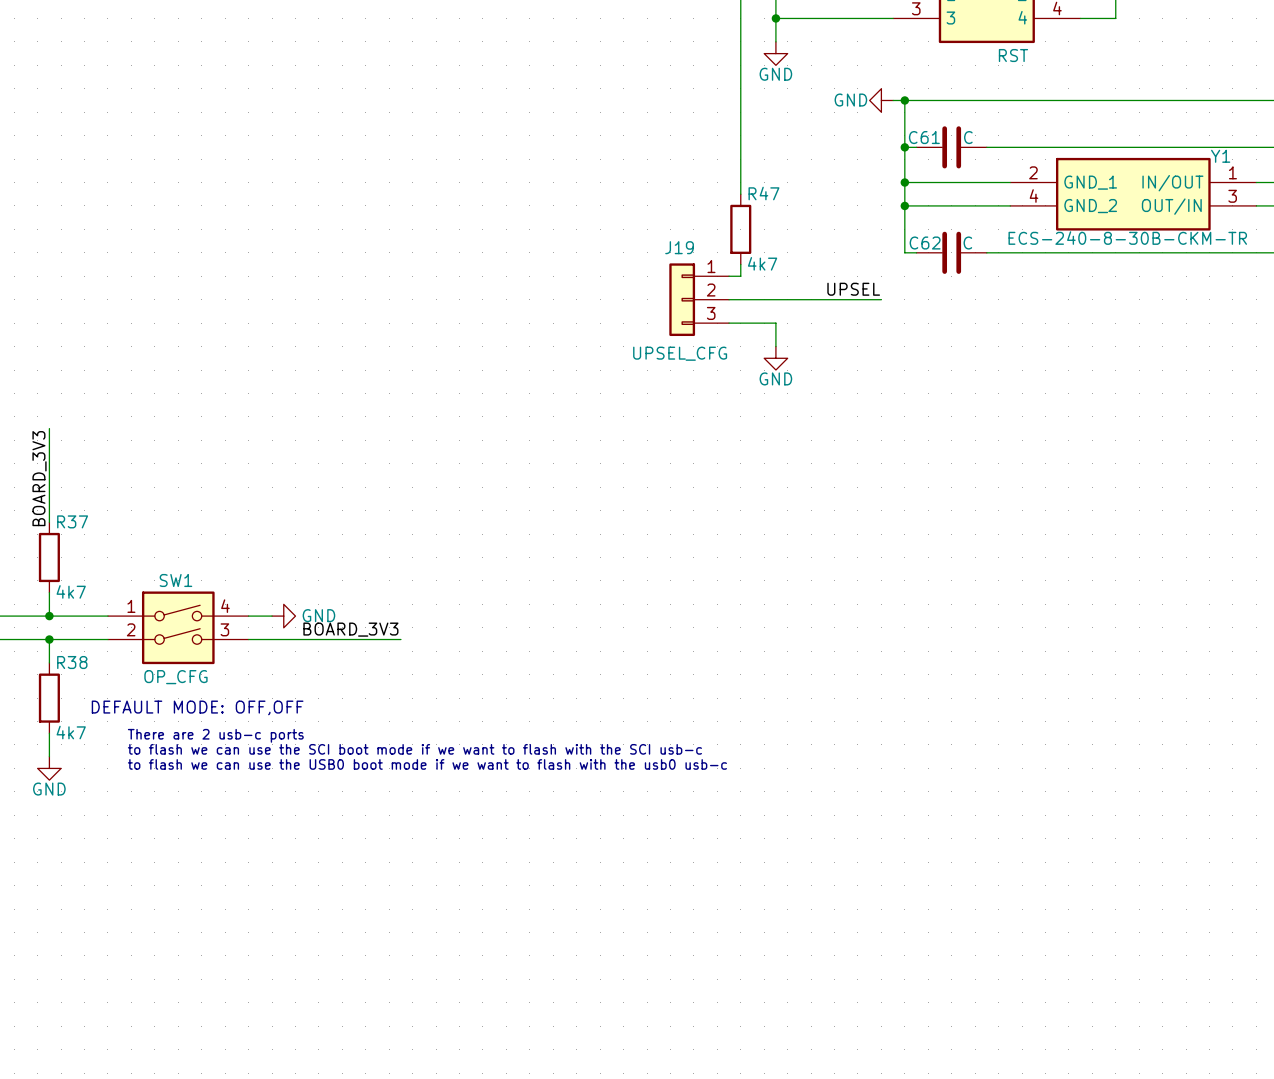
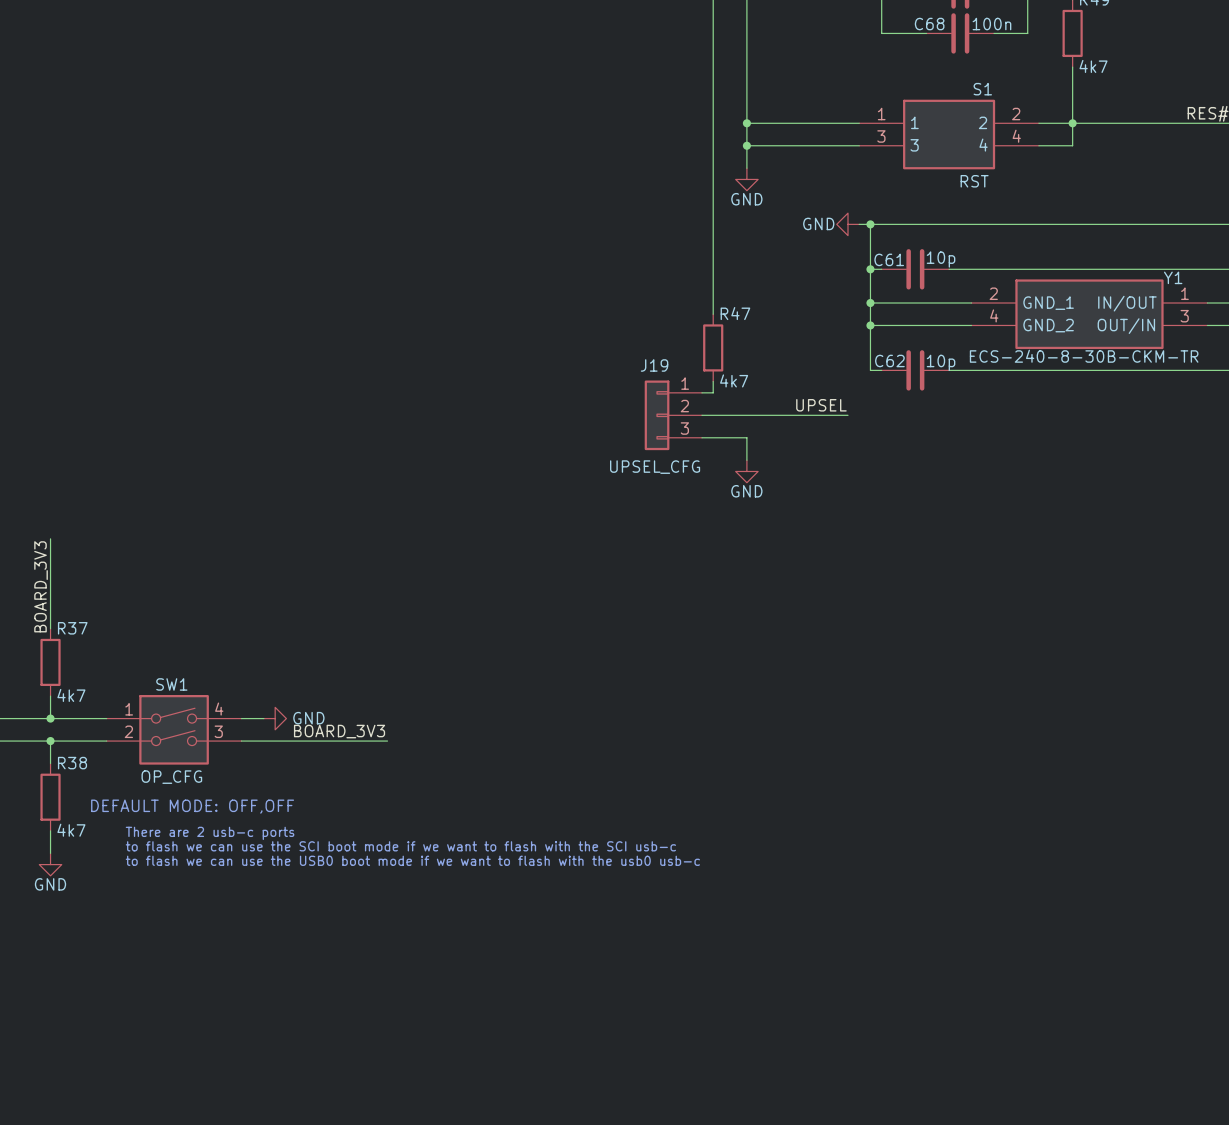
C61 value: C (968, 137) -> 10p (941, 259)
C62 value: C (967, 243) -> 10p (941, 362)

